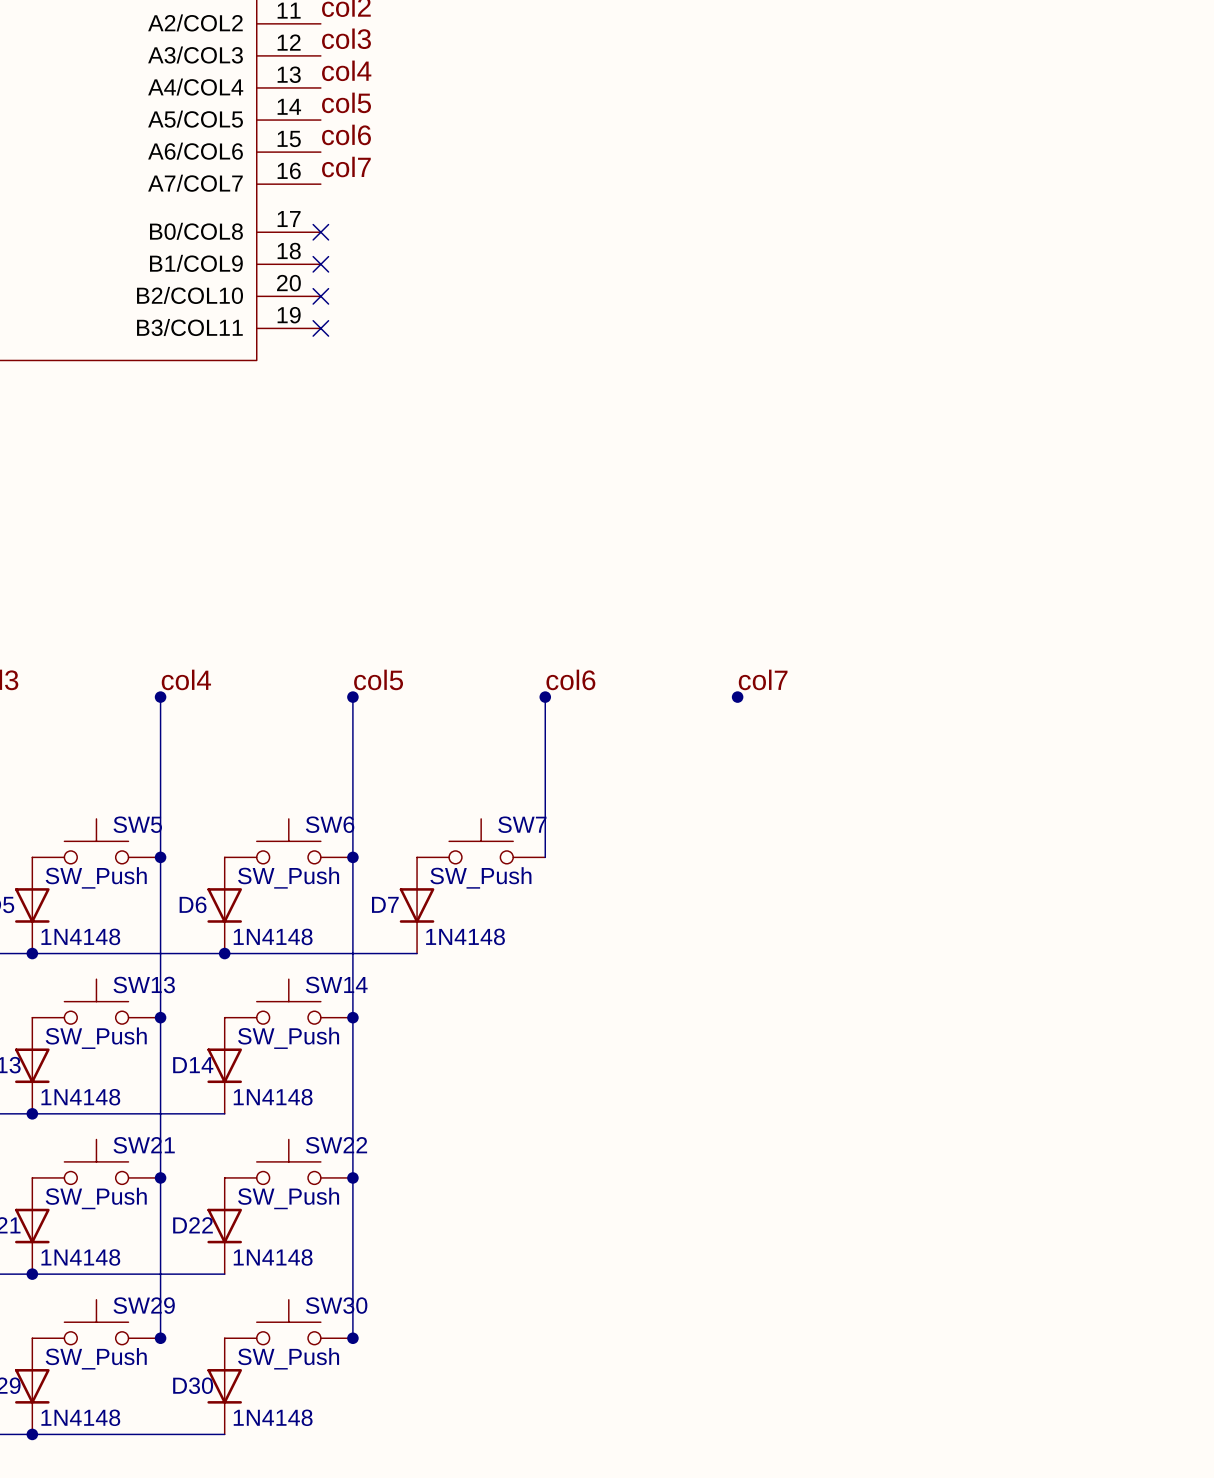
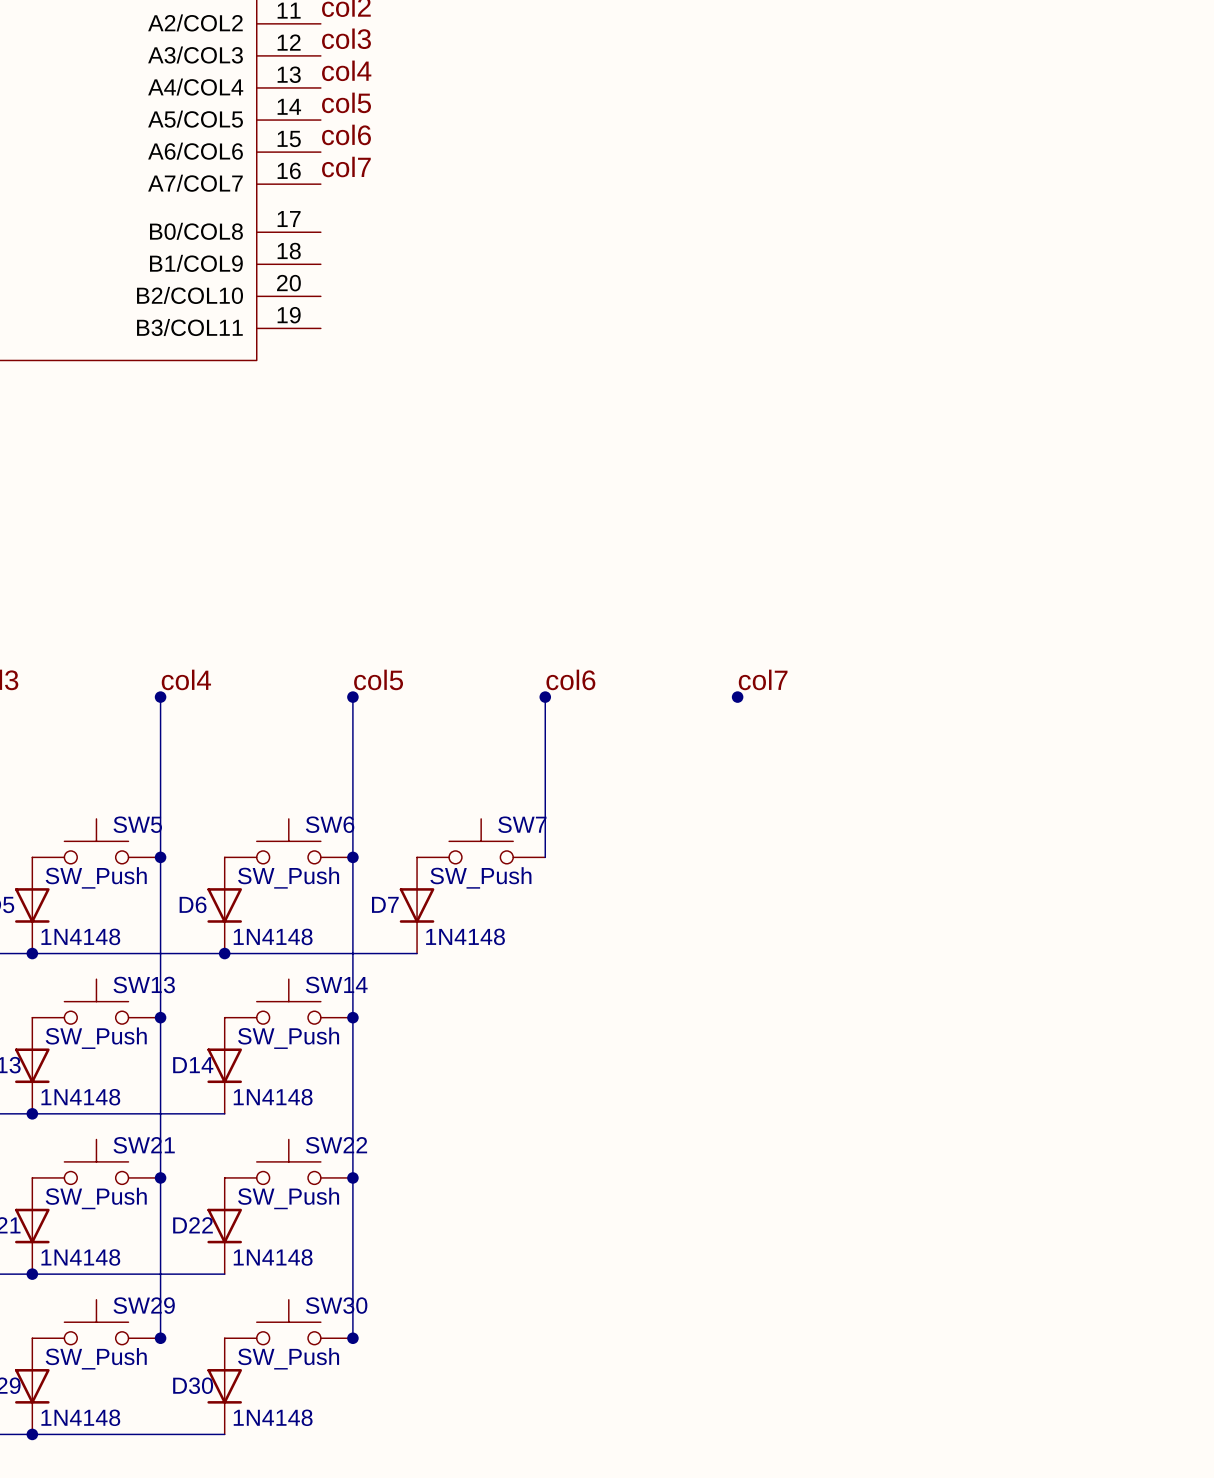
no-connect mark: (320, 232) -> none
no-connect mark: (320, 264) -> none
no-connect mark: (320, 296) -> none
no-connect mark: (320, 328) -> none

